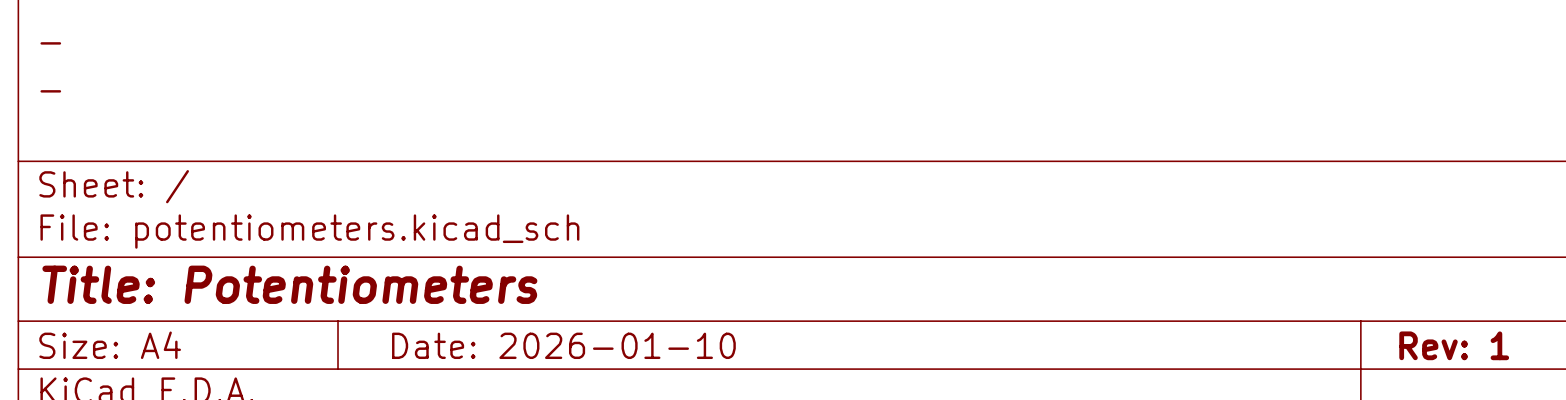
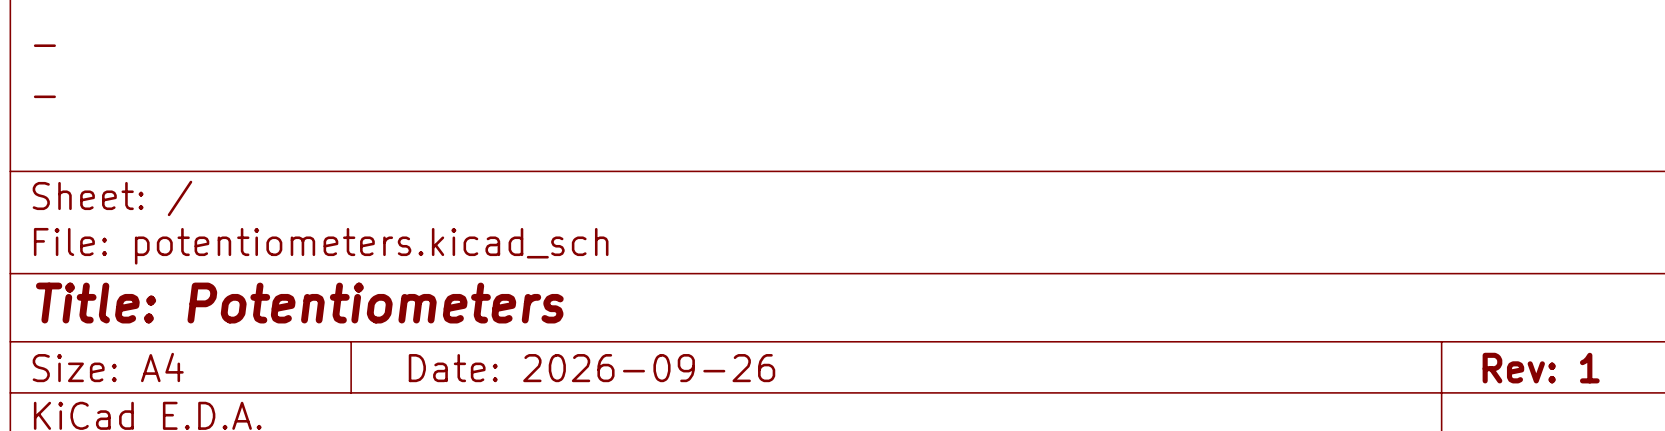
title block: Date: 2026-01-10 (563, 345) -> Date: 2026-09-26 (591, 368)

